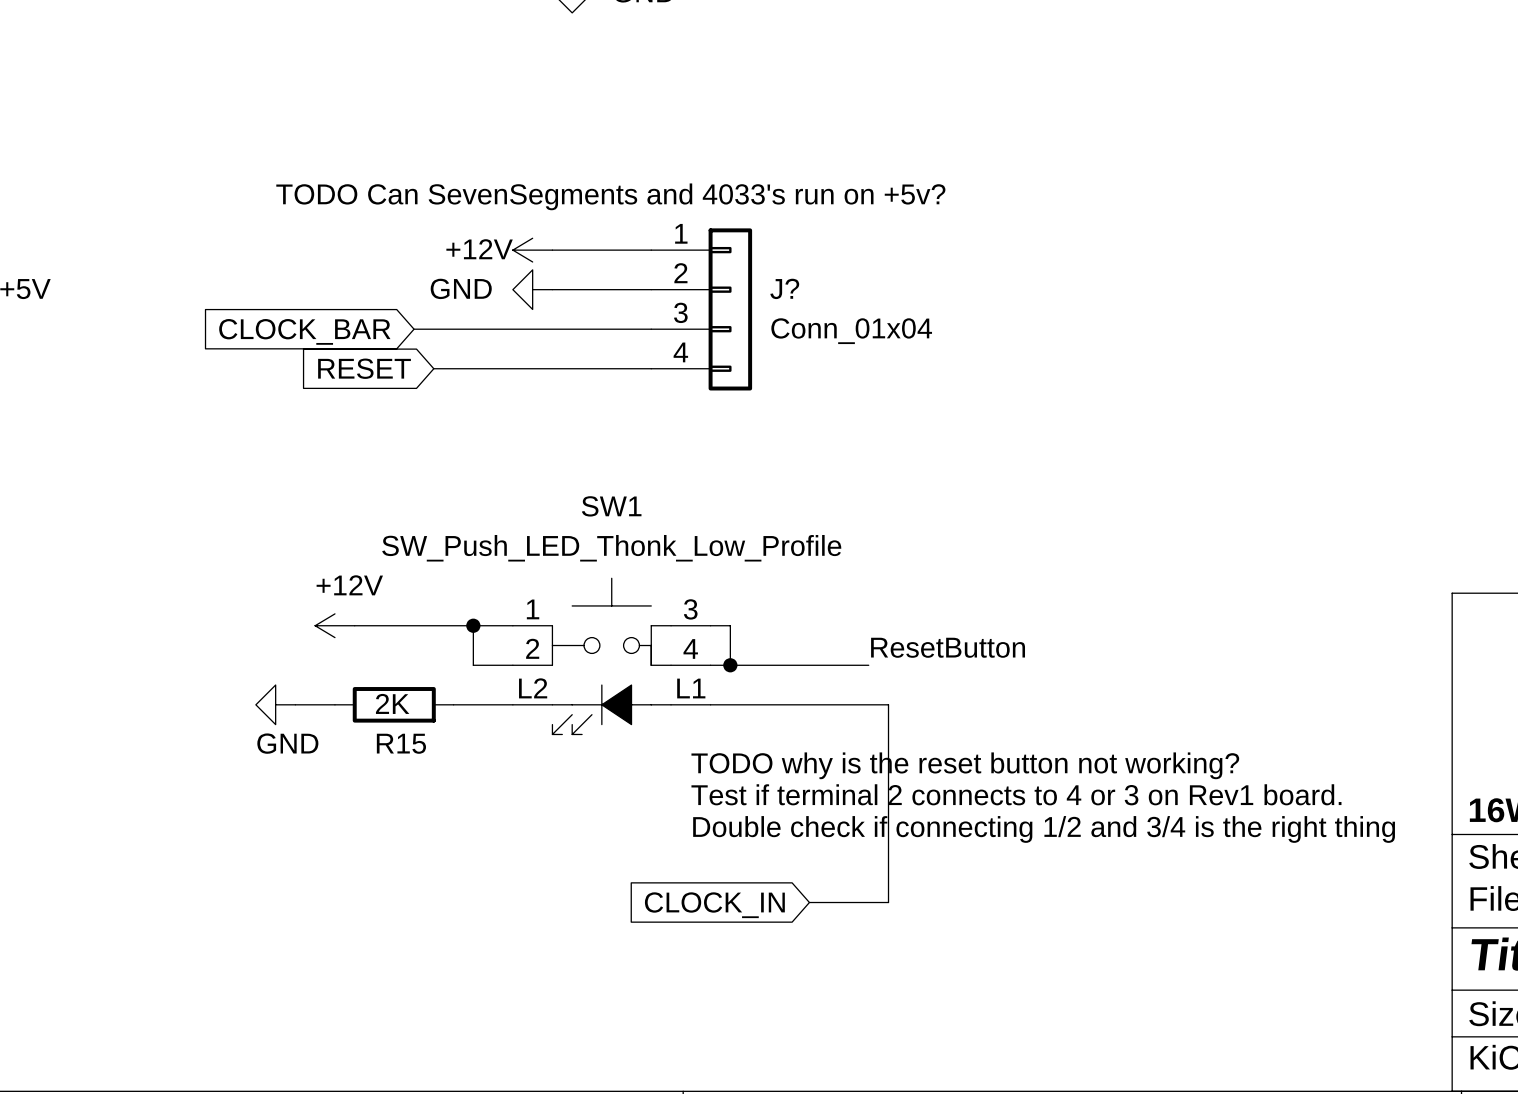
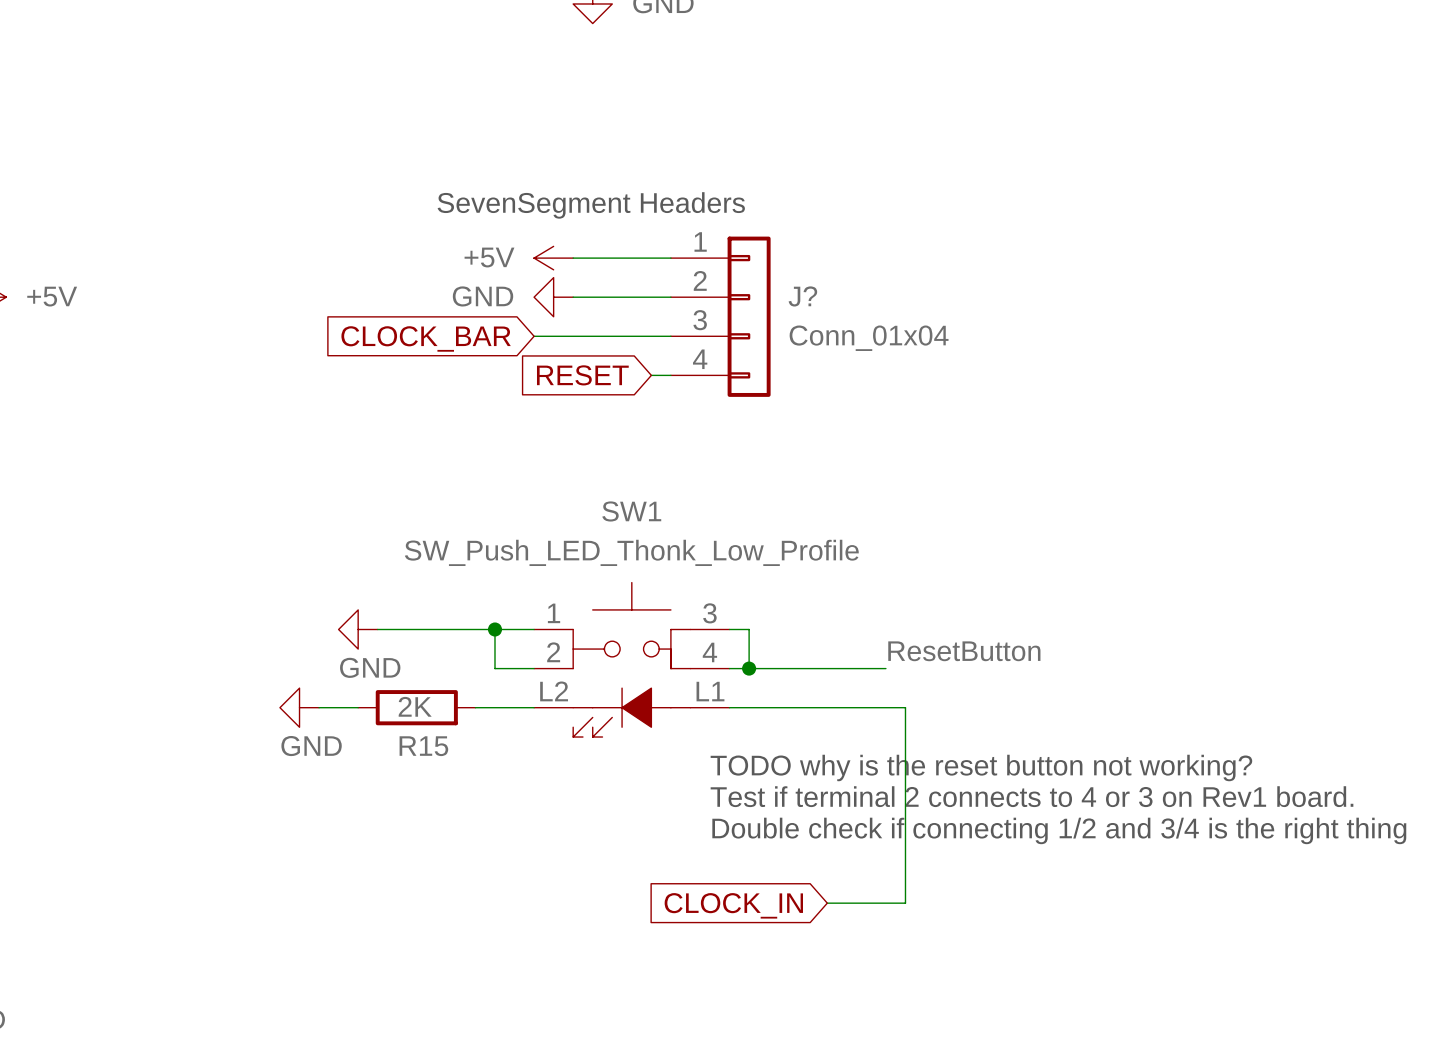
text: none -> SevenSegment Headers (591, 205)
text: TODO Can SevenSegments and 4033's run on +5v? (610, 196) -> none
power symbol: +12V (532, 250) -> +5V (553, 258)
wire: (414, 329) (512, 329) -> none
global label position: CLOCK_BAR (304, 331) -> CLOCK_BAR (426, 338)
global label position: RESET (364, 368) -> RESET (582, 375)
wire: (433, 368) (631, 368) -> none
power symbol: +12V (334, 625) -> GND (358, 629)

